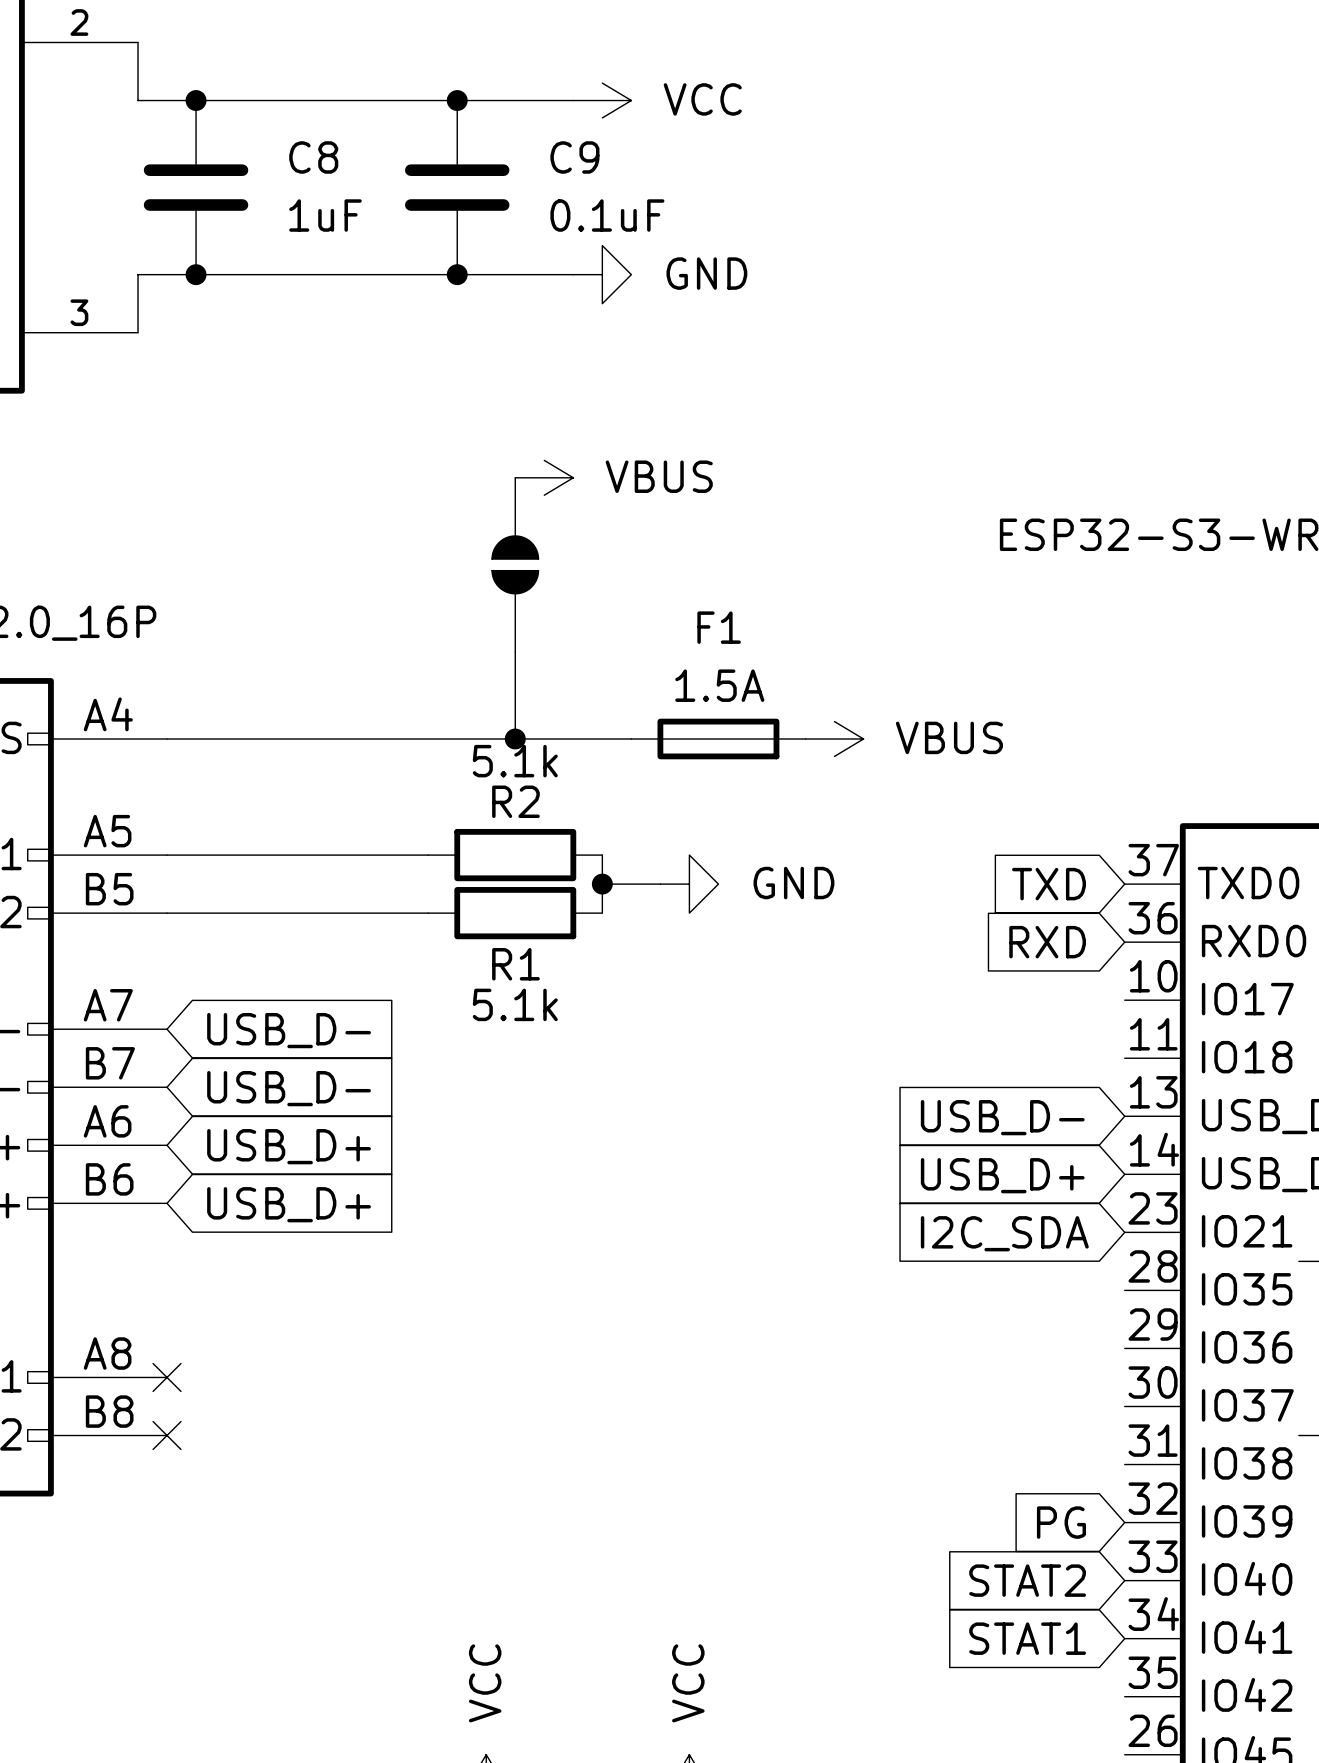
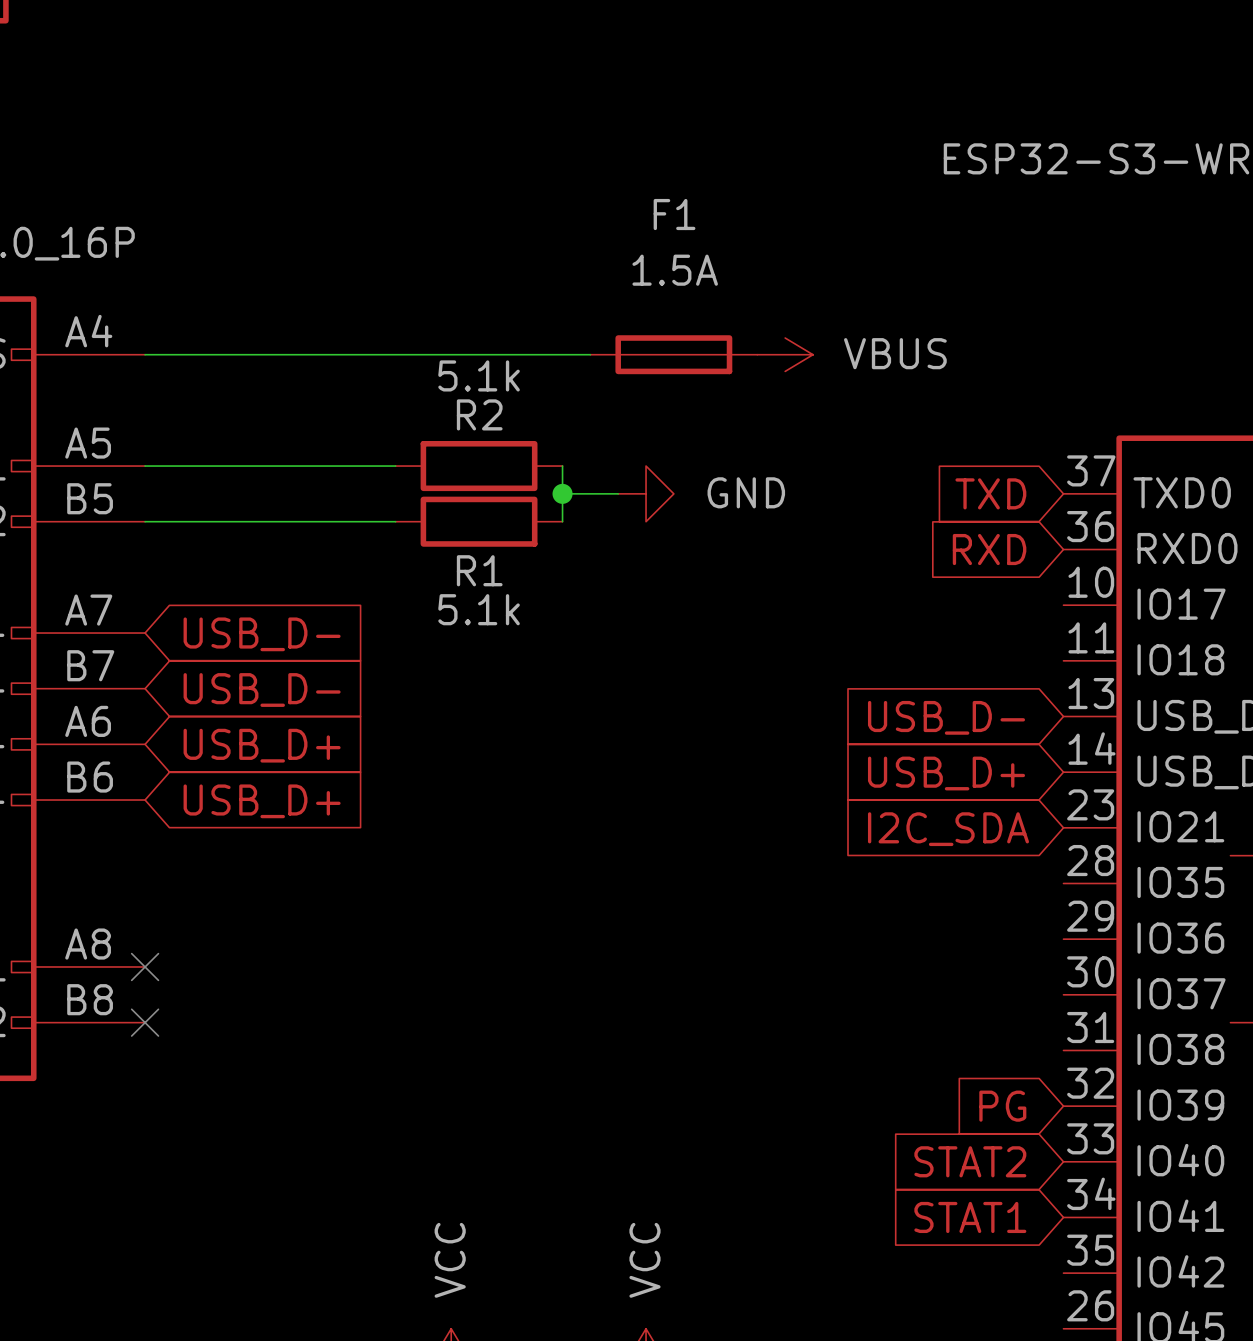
power symbol: VBUS (544, 477) -> none
part: (515, 564) -> none
F1 name position: F1 (719, 627) -> F1 (674, 214)
wire: (515, 651) (515, 739) -> none
F1 value position: 1.5A (719, 685) -> 1.5A (675, 270)
junction: (515, 739) -> none

